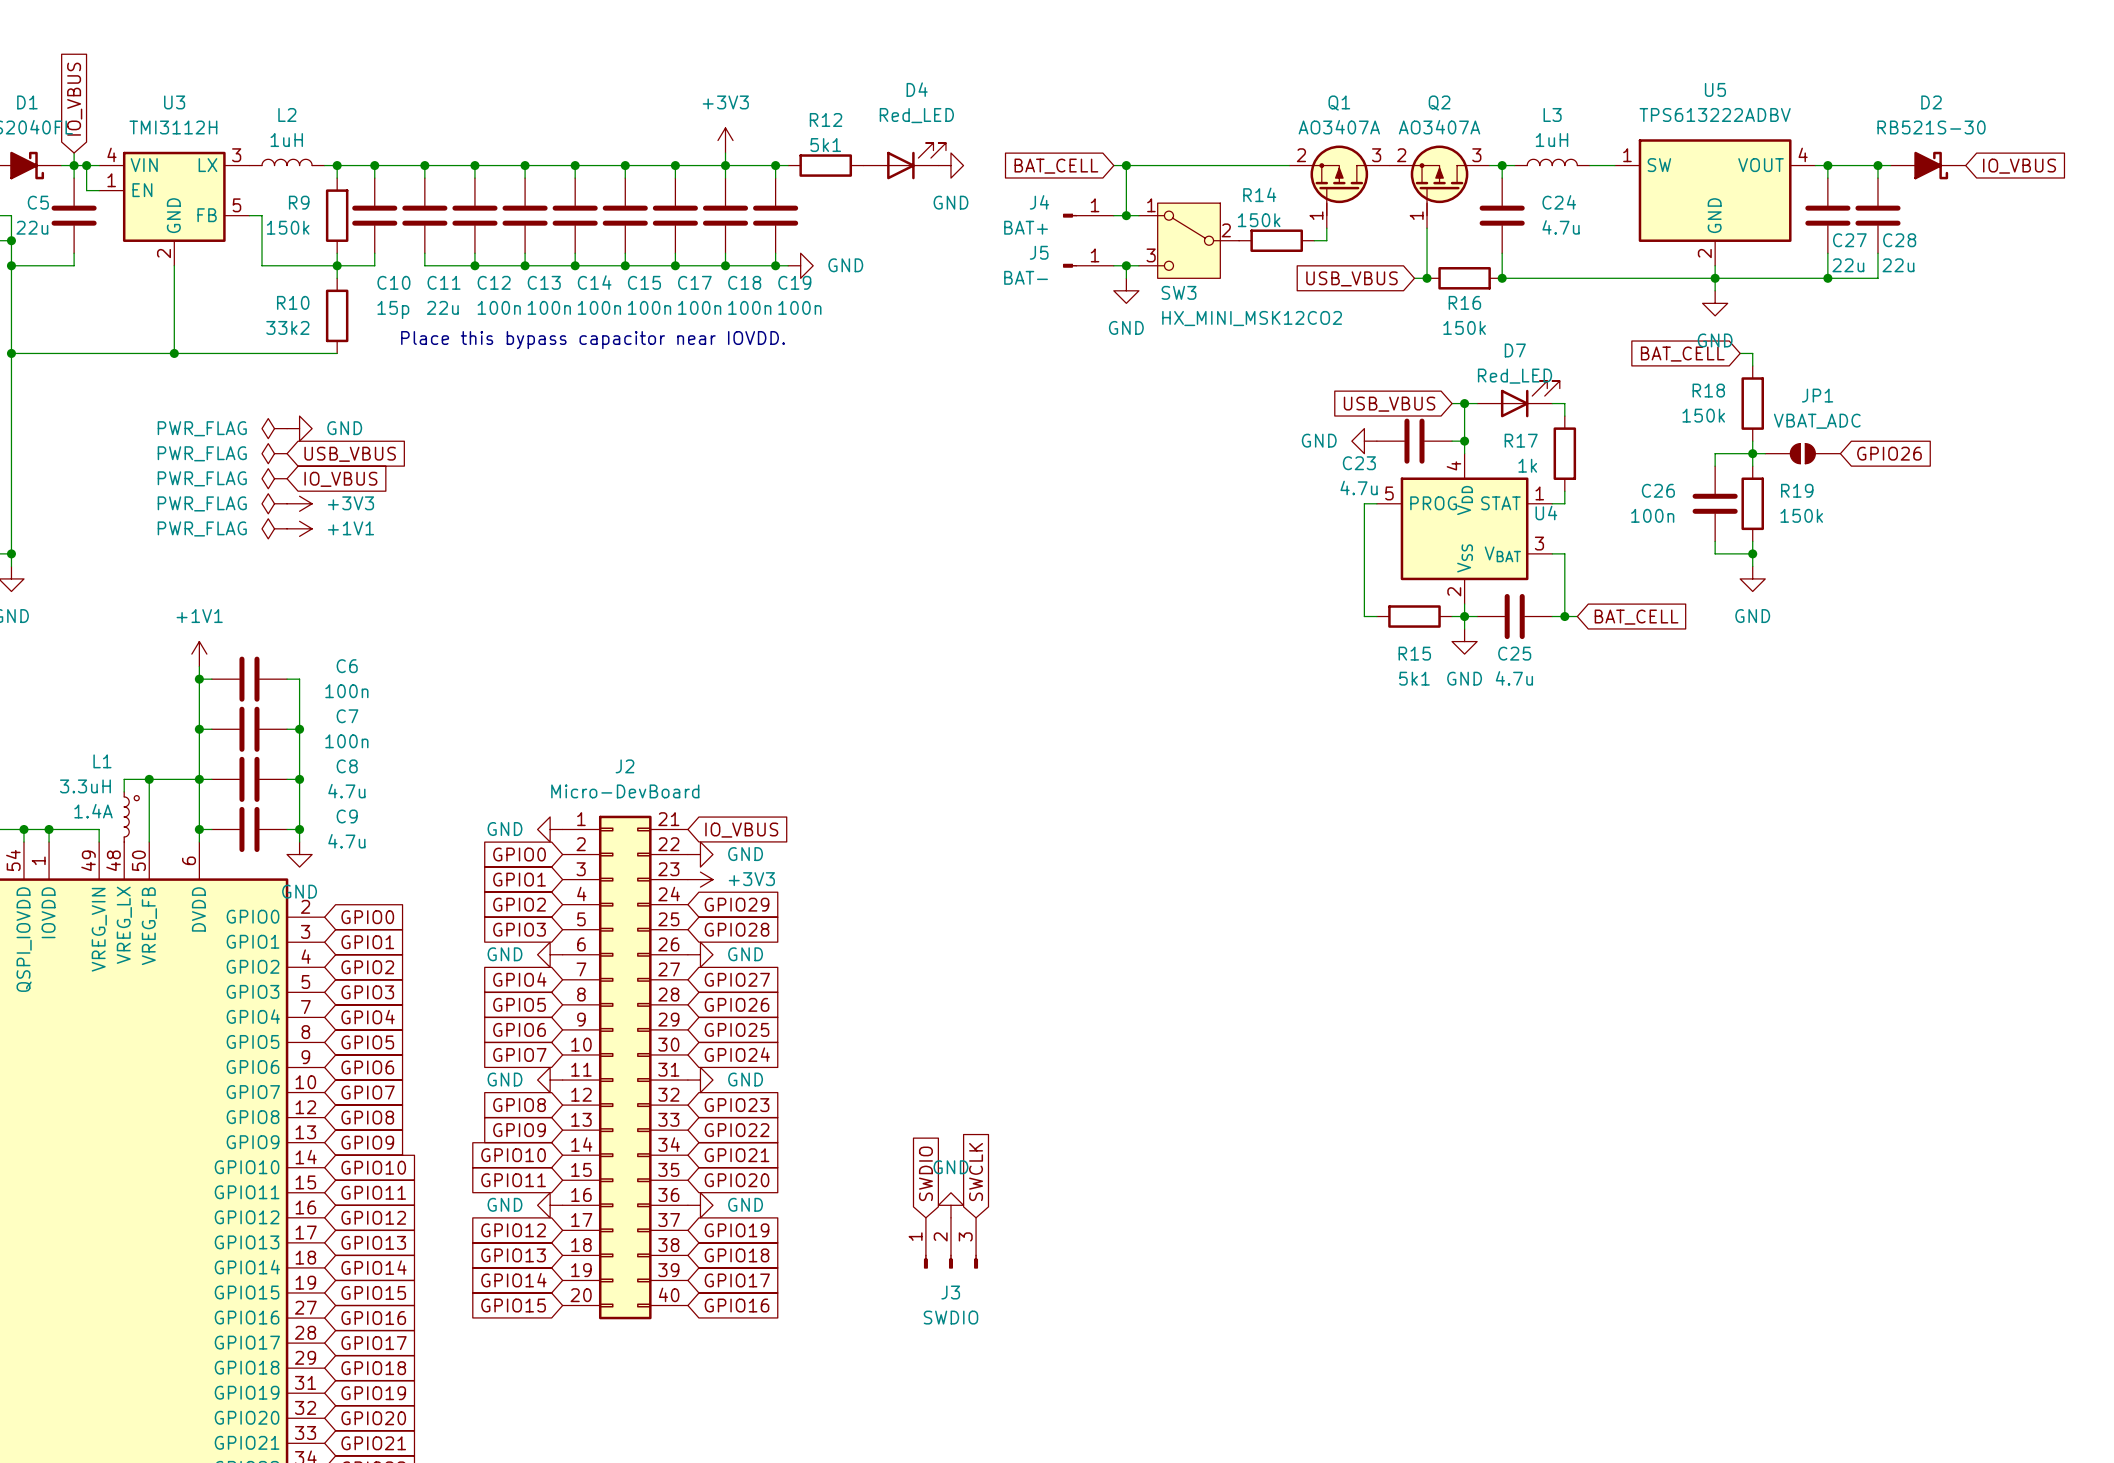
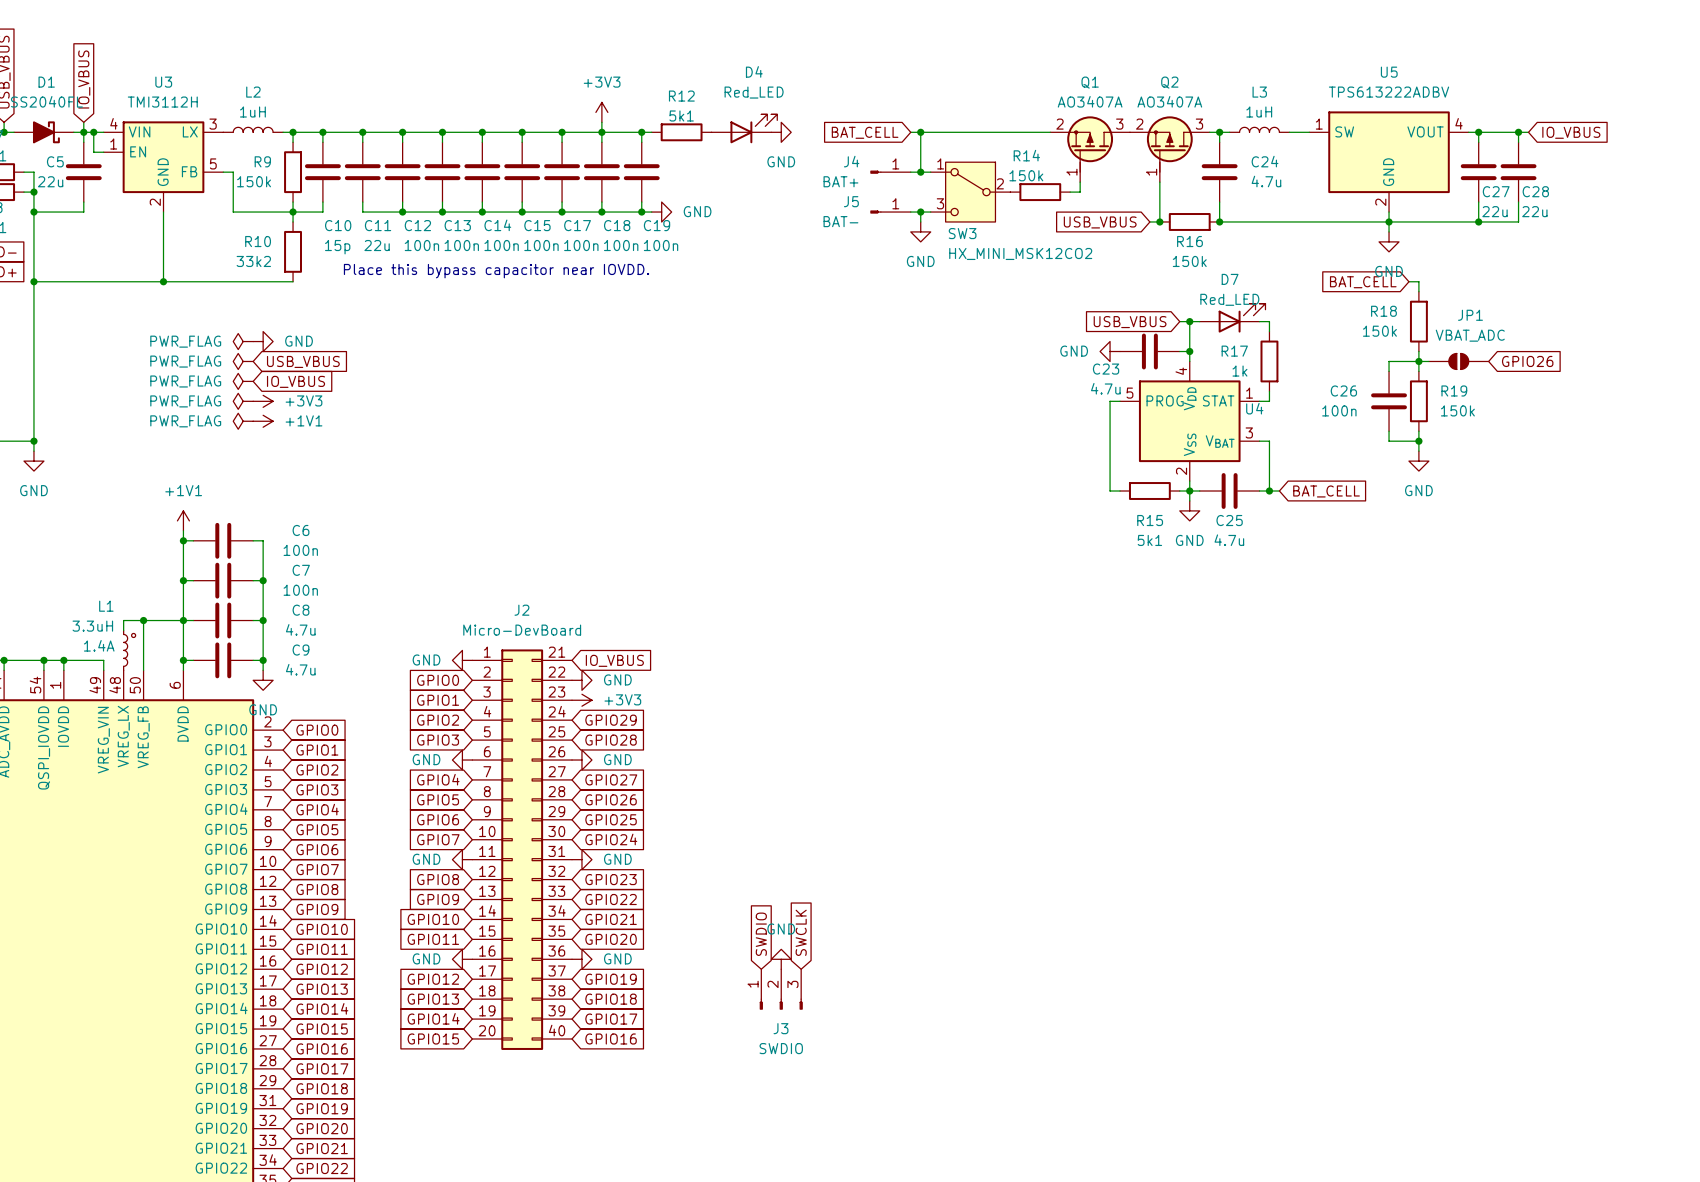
D2: RB521S-30 (1928, 165) -> none
global label position: IO_VBUS (2019, 166) -> IO_VBUS (1571, 132)

